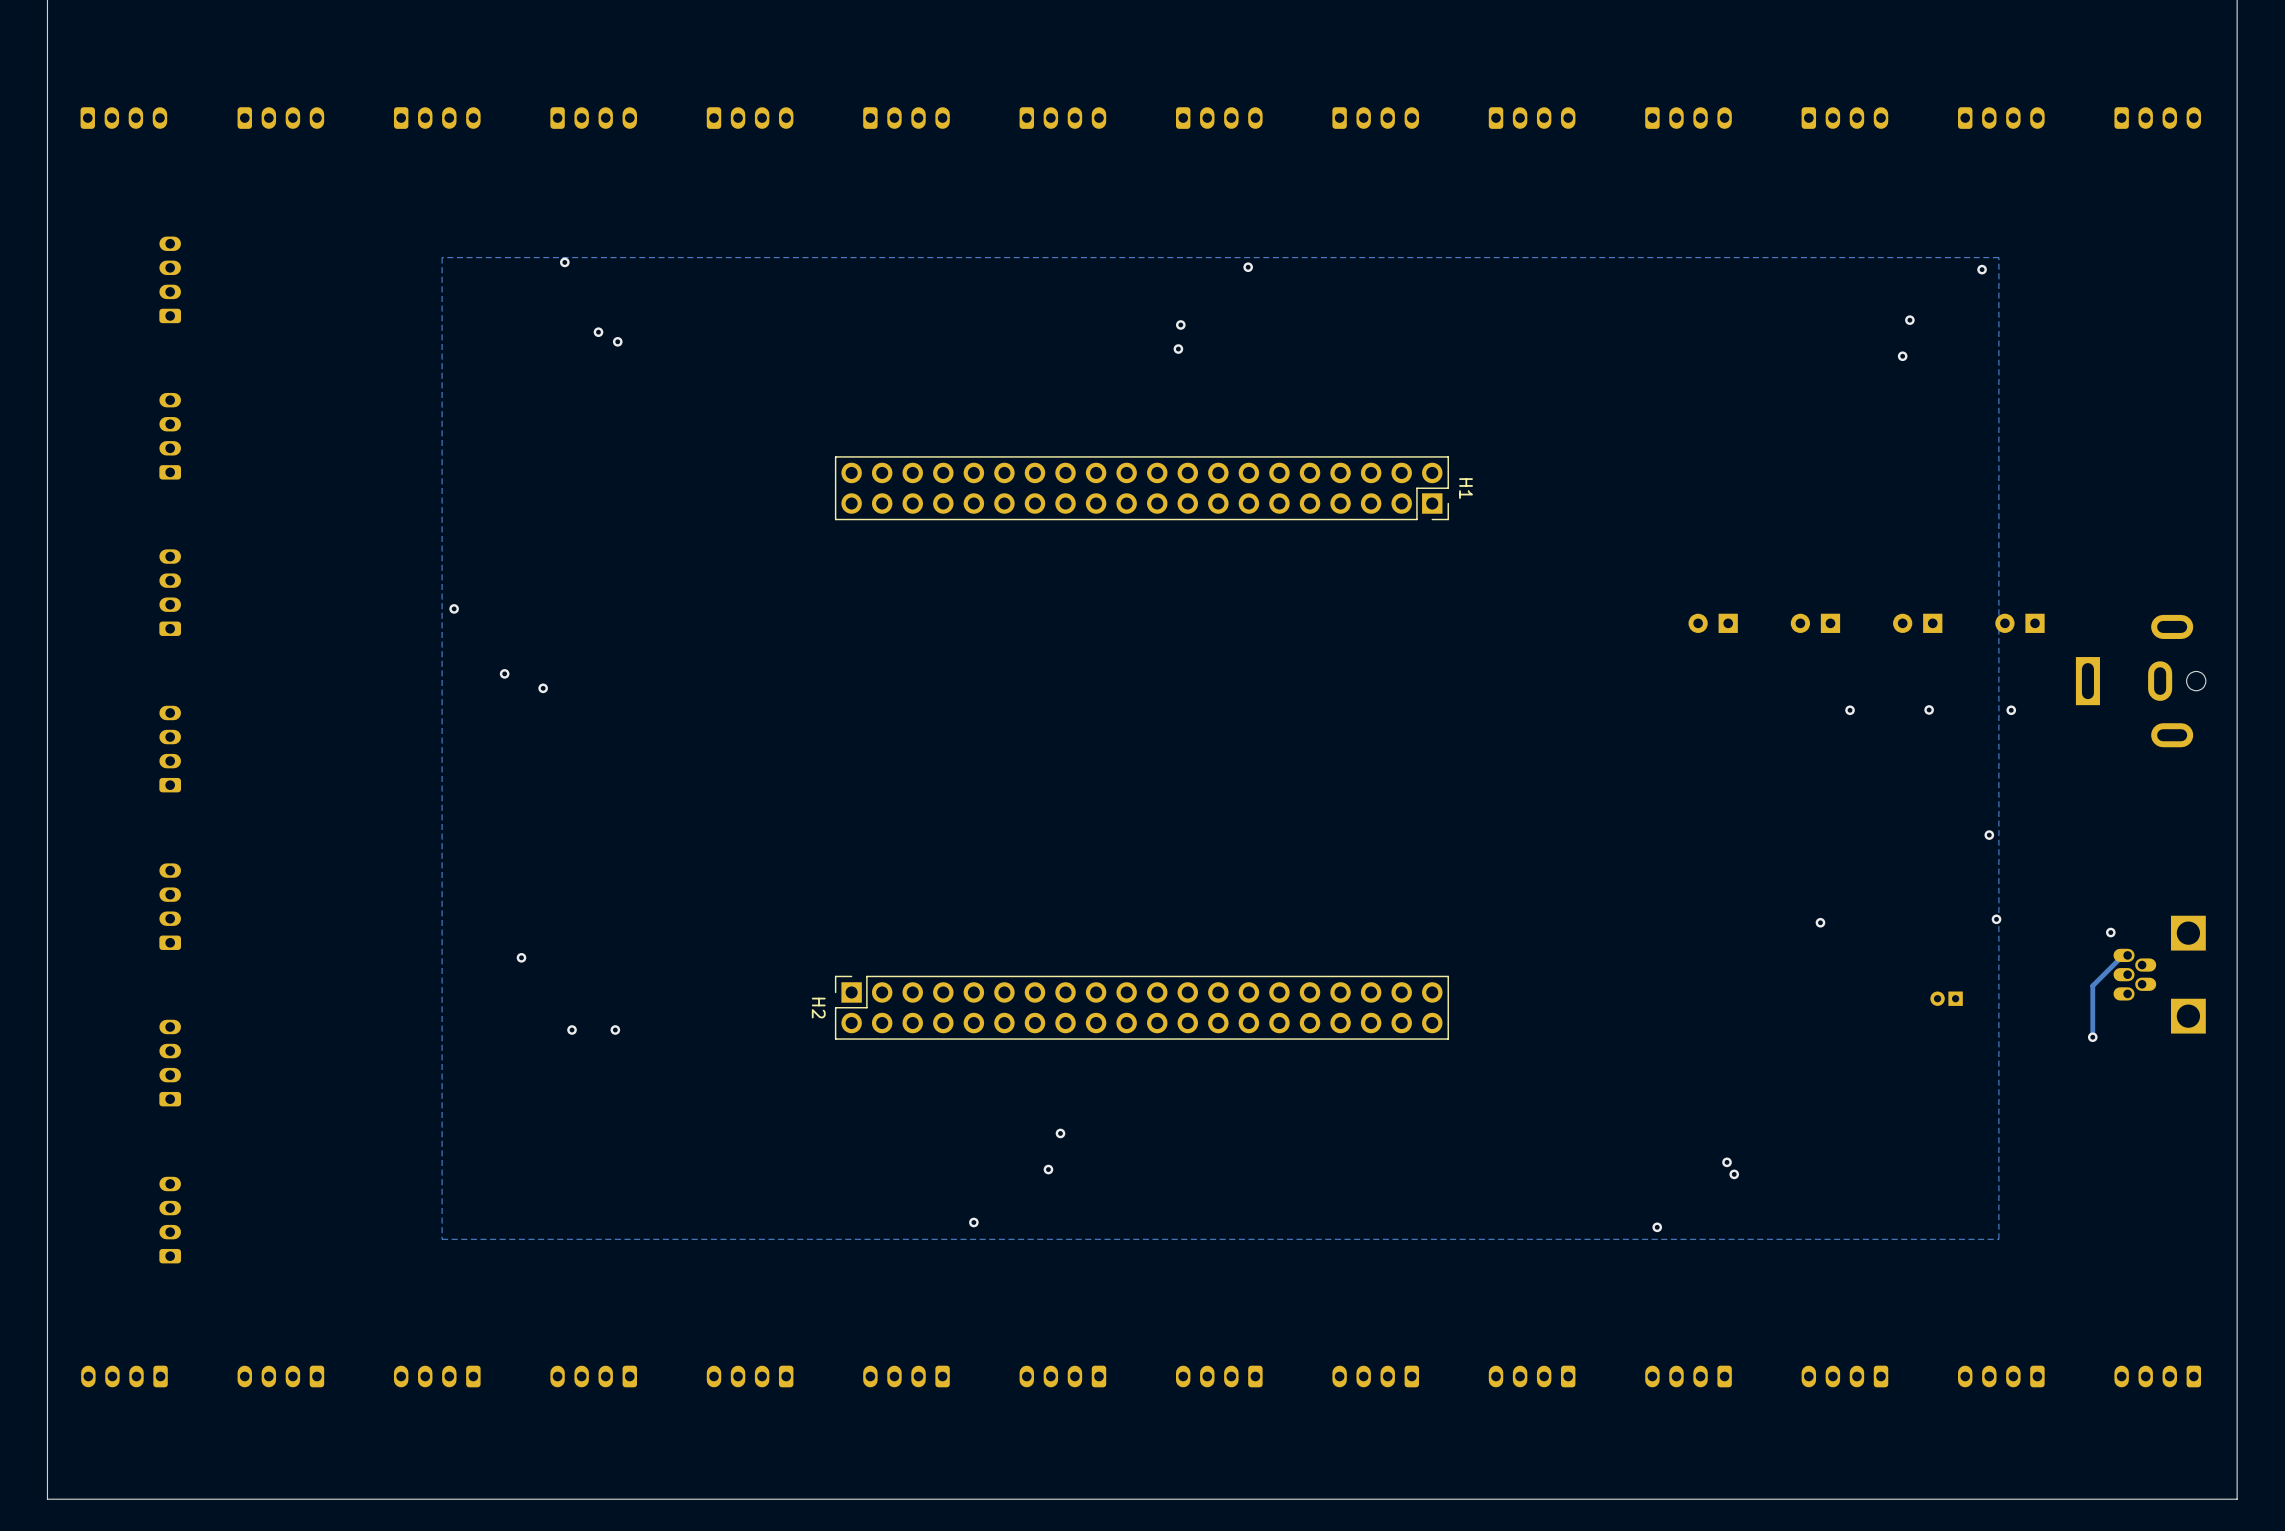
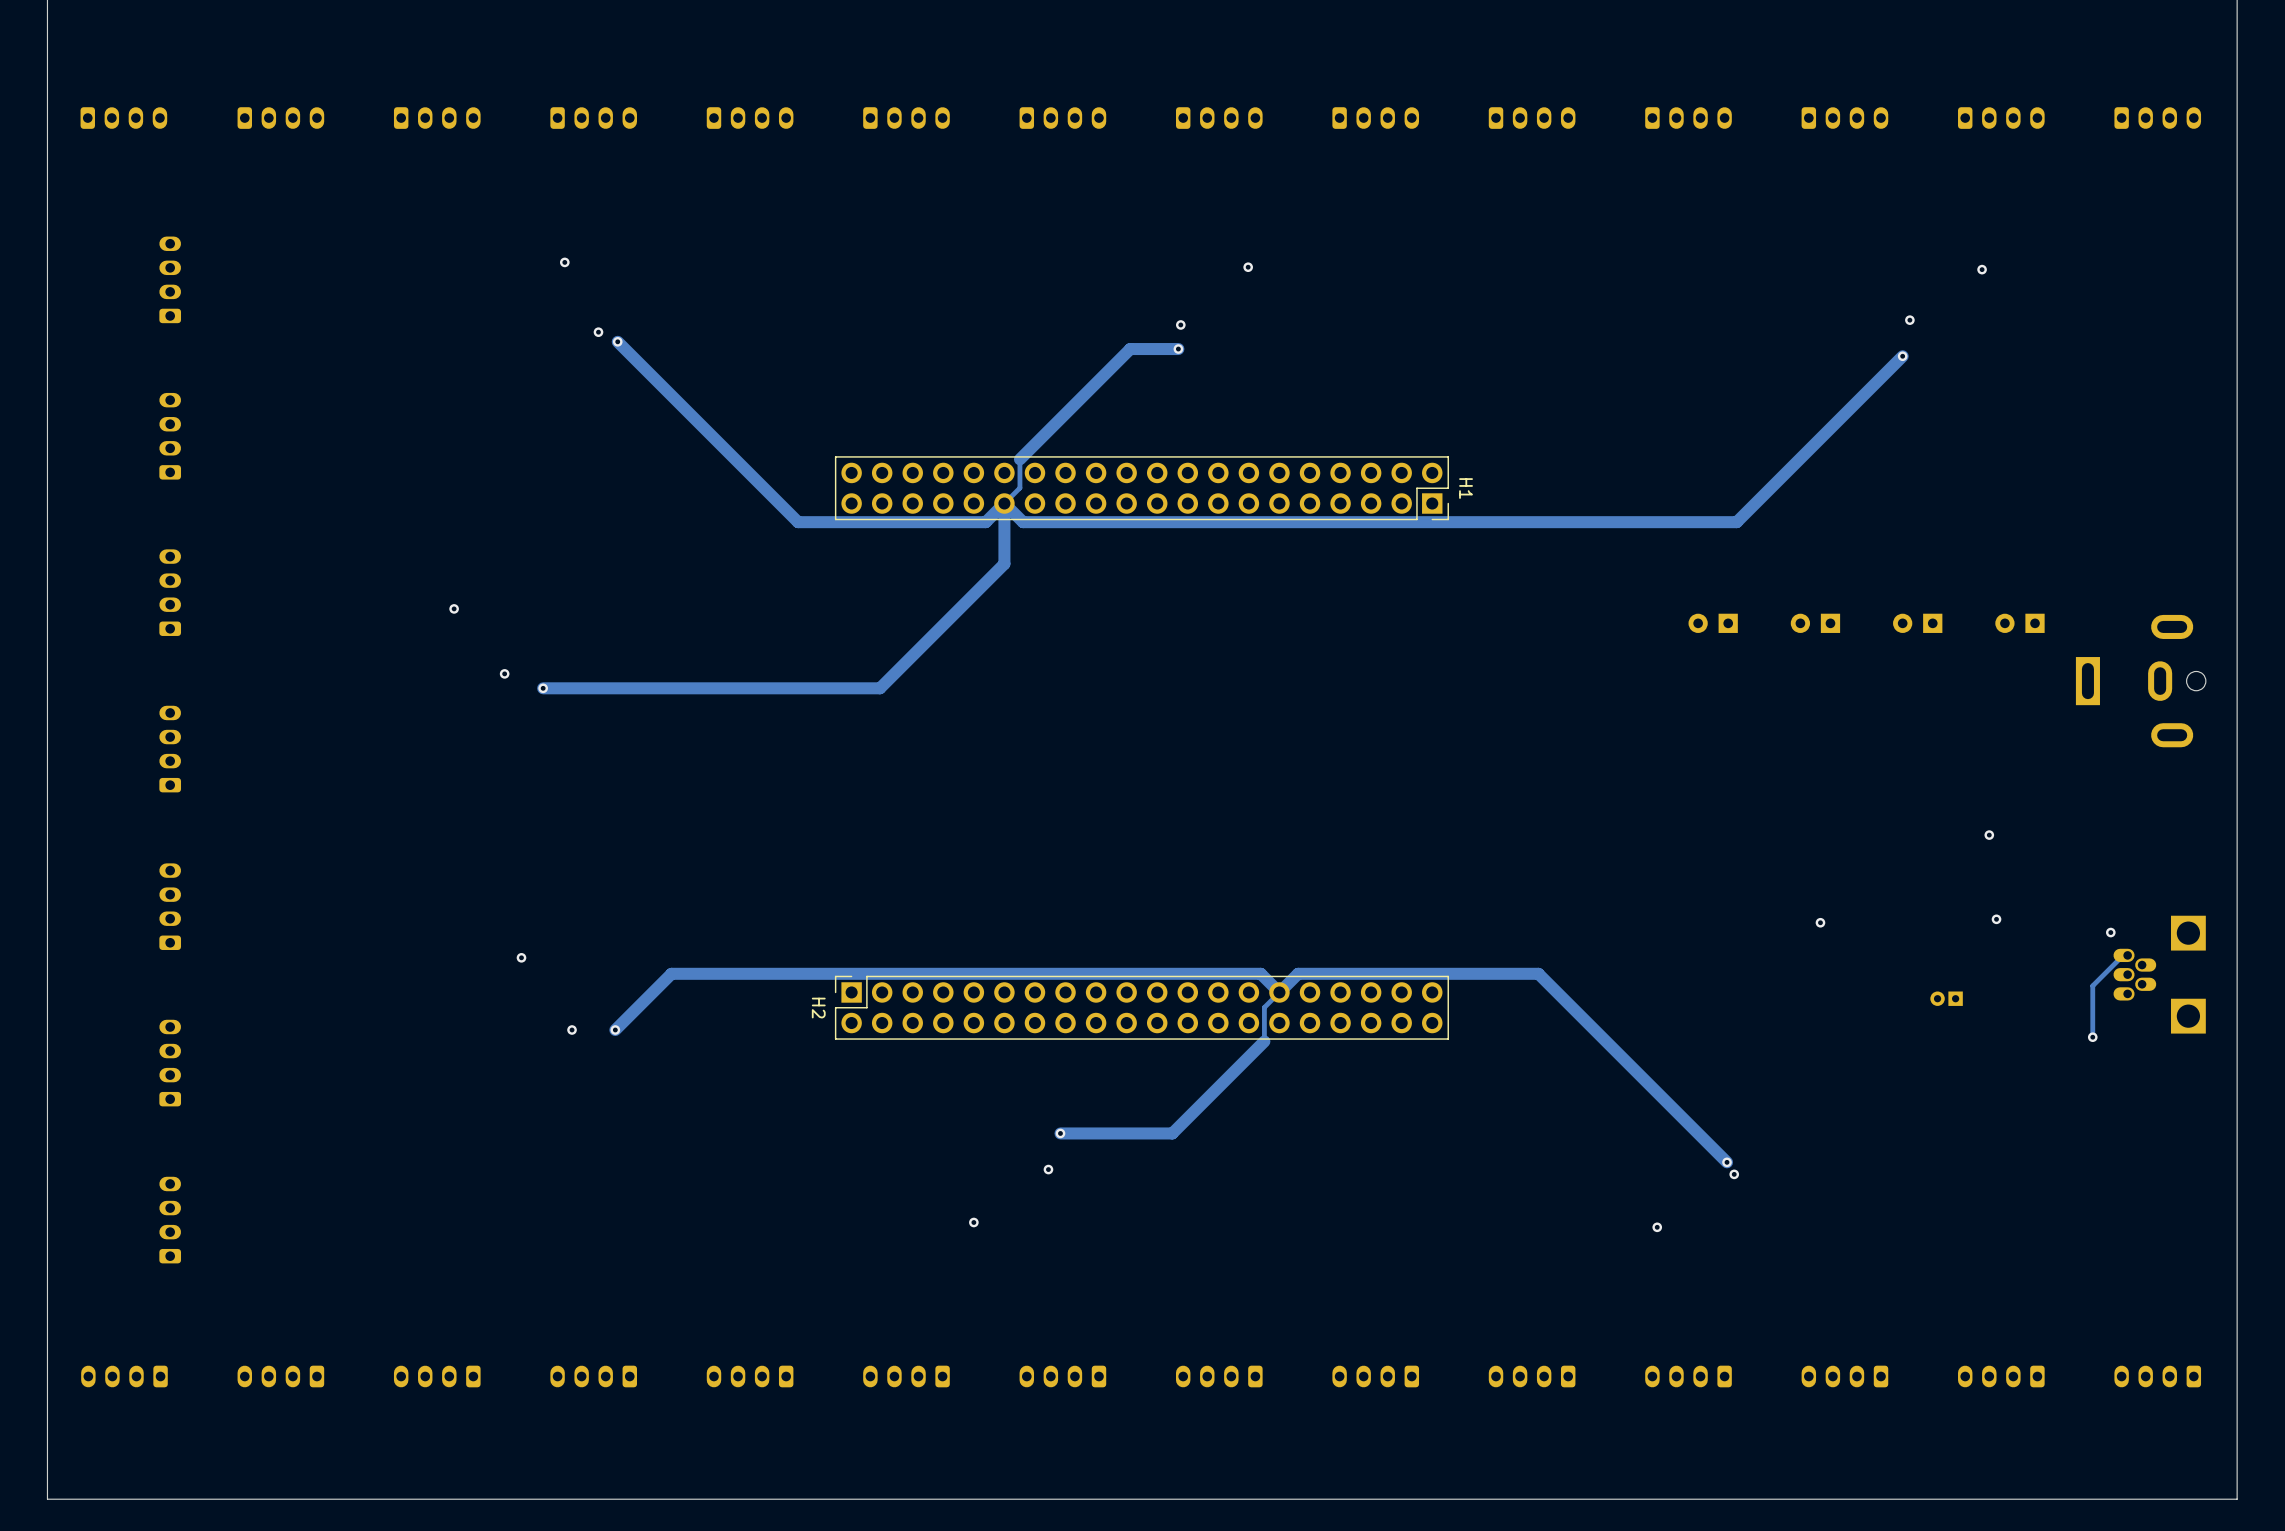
zone outline: (1998, 257) (1998, 1239) (442, 1239) (442, 257) (1998, 257) -> none
track: none -> (617, 341) (798, 522) (985, 522) (1004, 503)
track: none -> (1178, 349) (1130, 349) (1019, 459) (1019, 487) (1004, 503)
track: none -> (1902, 356) (1736, 522) (1023, 522) (1004, 503)
track: none -> (1004, 503) (1004, 563) (880, 688) (543, 688)
via: (1929, 709) -> none
via: (1850, 710) -> none
via: (2011, 710) -> none
track: none -> (1279, 992) (1298, 973) (1538, 973) (1727, 1162)
track: none -> (1279, 992) (1260, 973) (671, 973) (615, 1029)
track: none -> (1279, 992) (1264, 1007) (1264, 1042)
track: none -> (1264, 1041) (1172, 1133) (1060, 1133)

